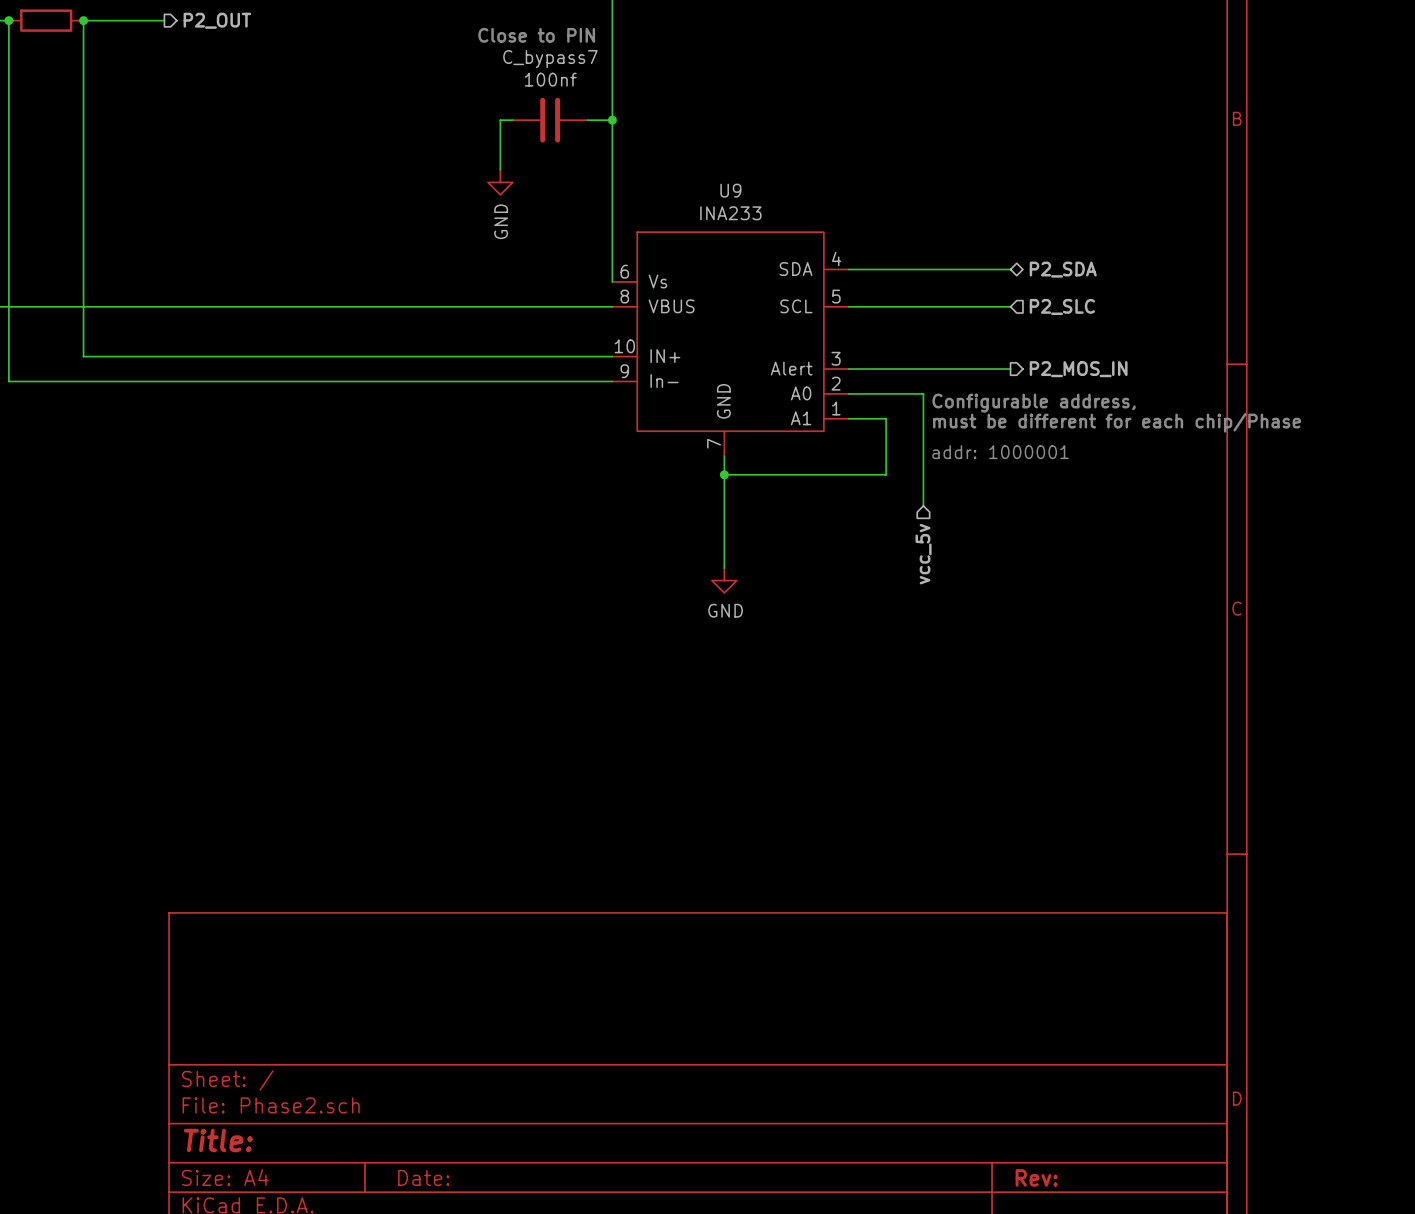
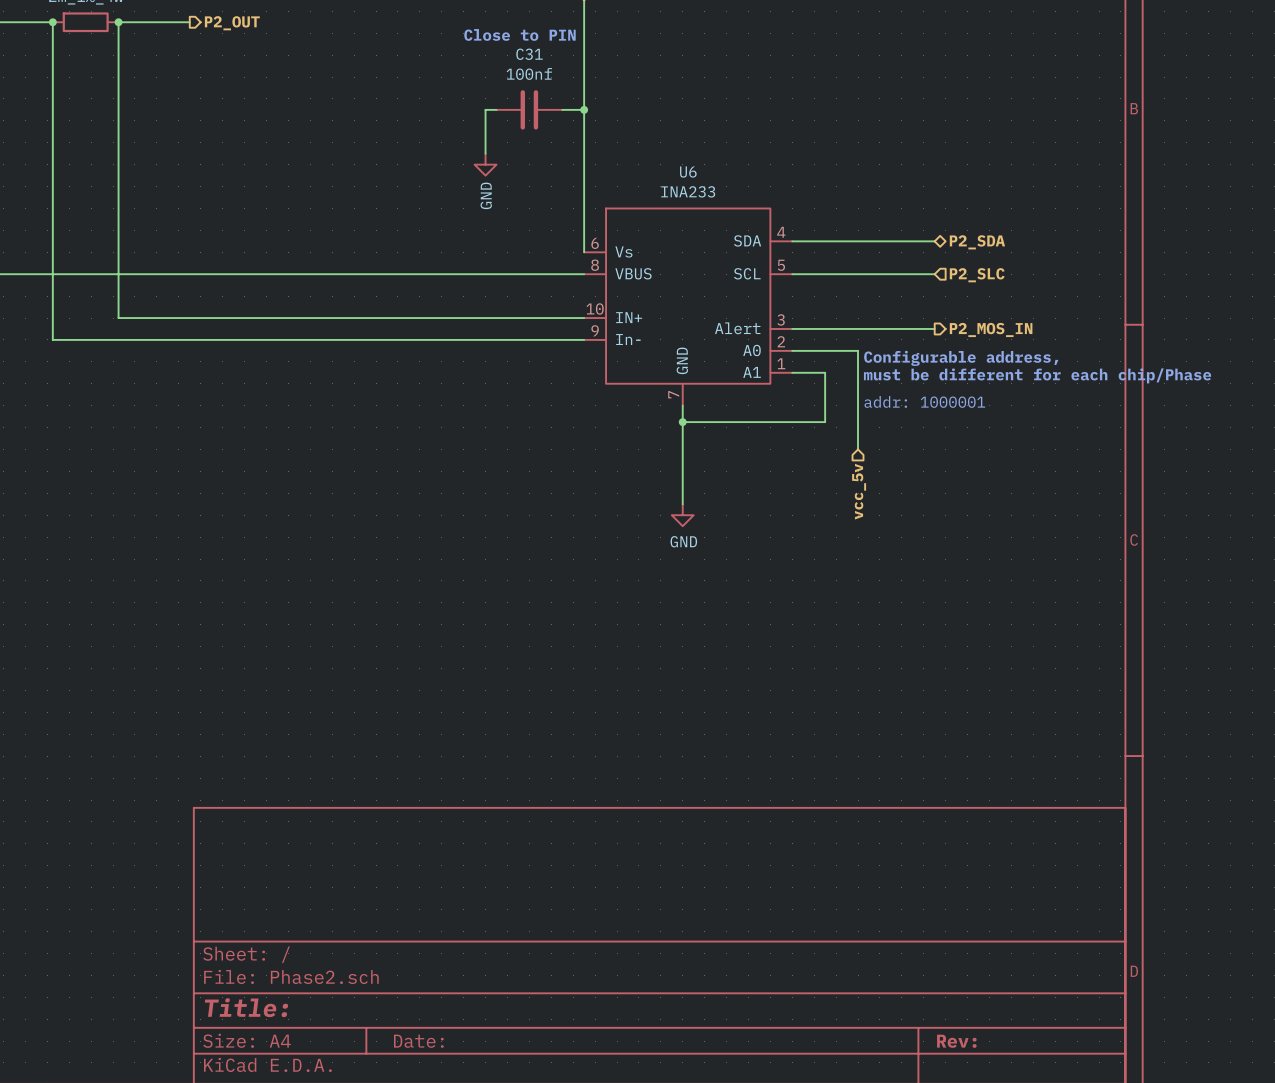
C_bypass7 name: C_bypass7 (550, 59) -> C31 (529, 54)
U9 name: U9 (730, 190) -> U6 (688, 172)

